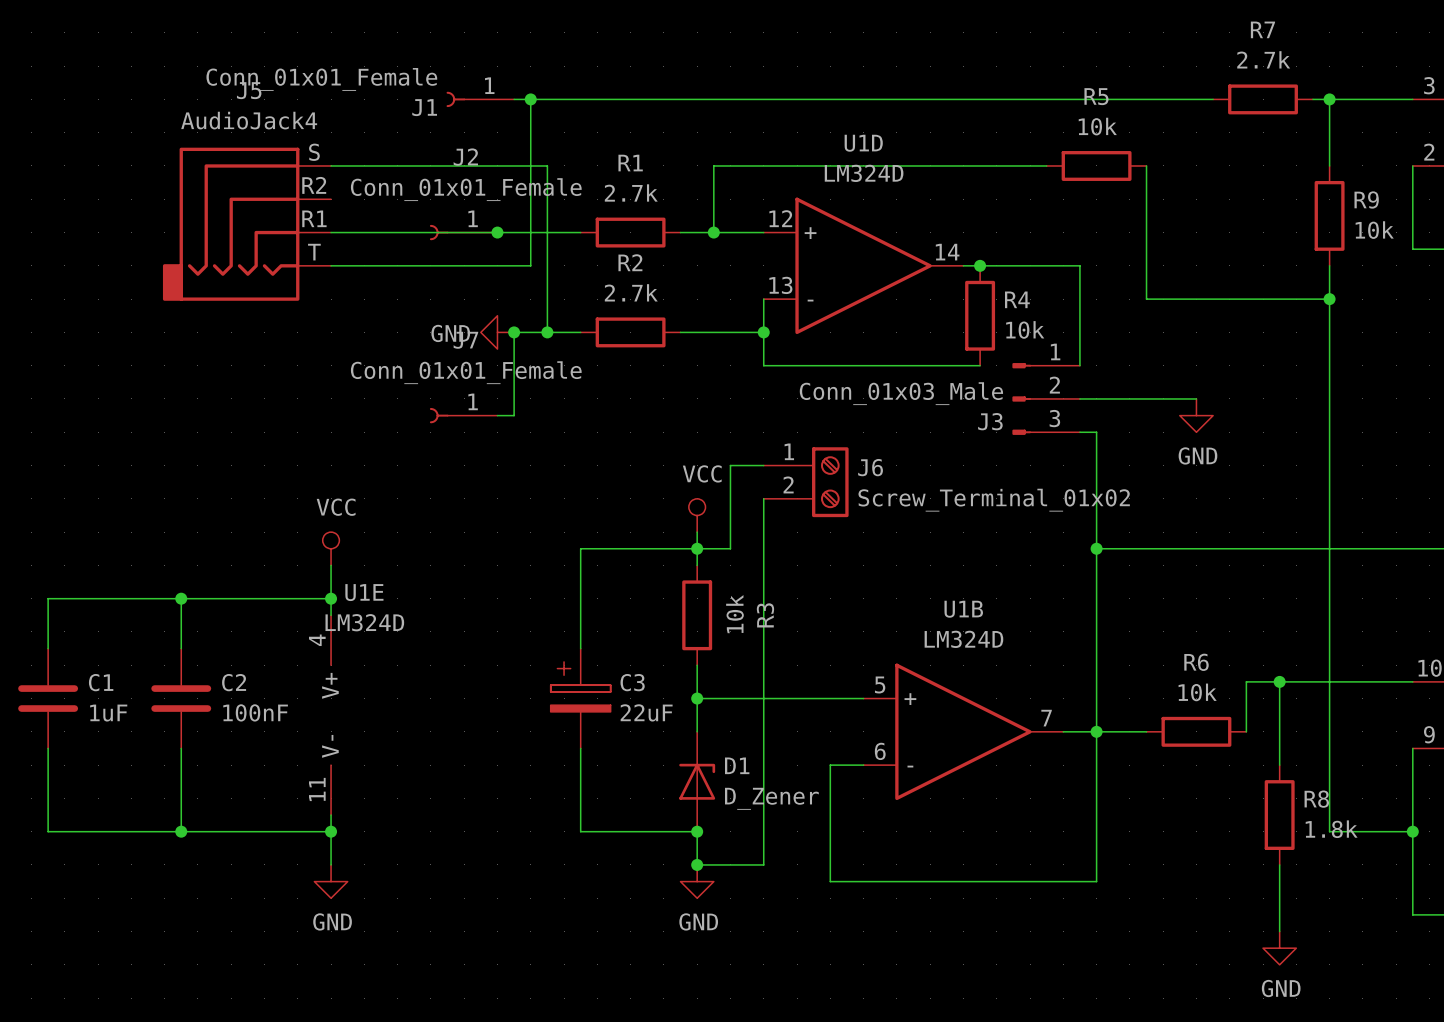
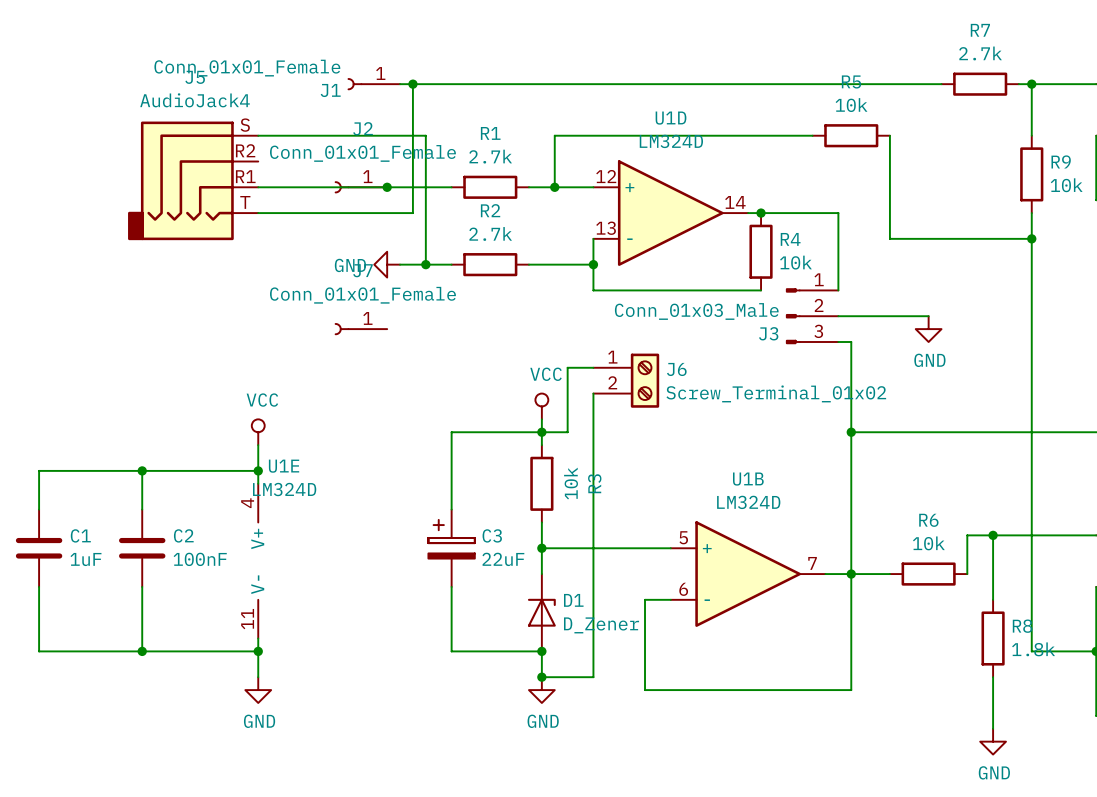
wire: (514, 332) (514, 415) (497, 415) -> none
junction: (514, 332) -> none

